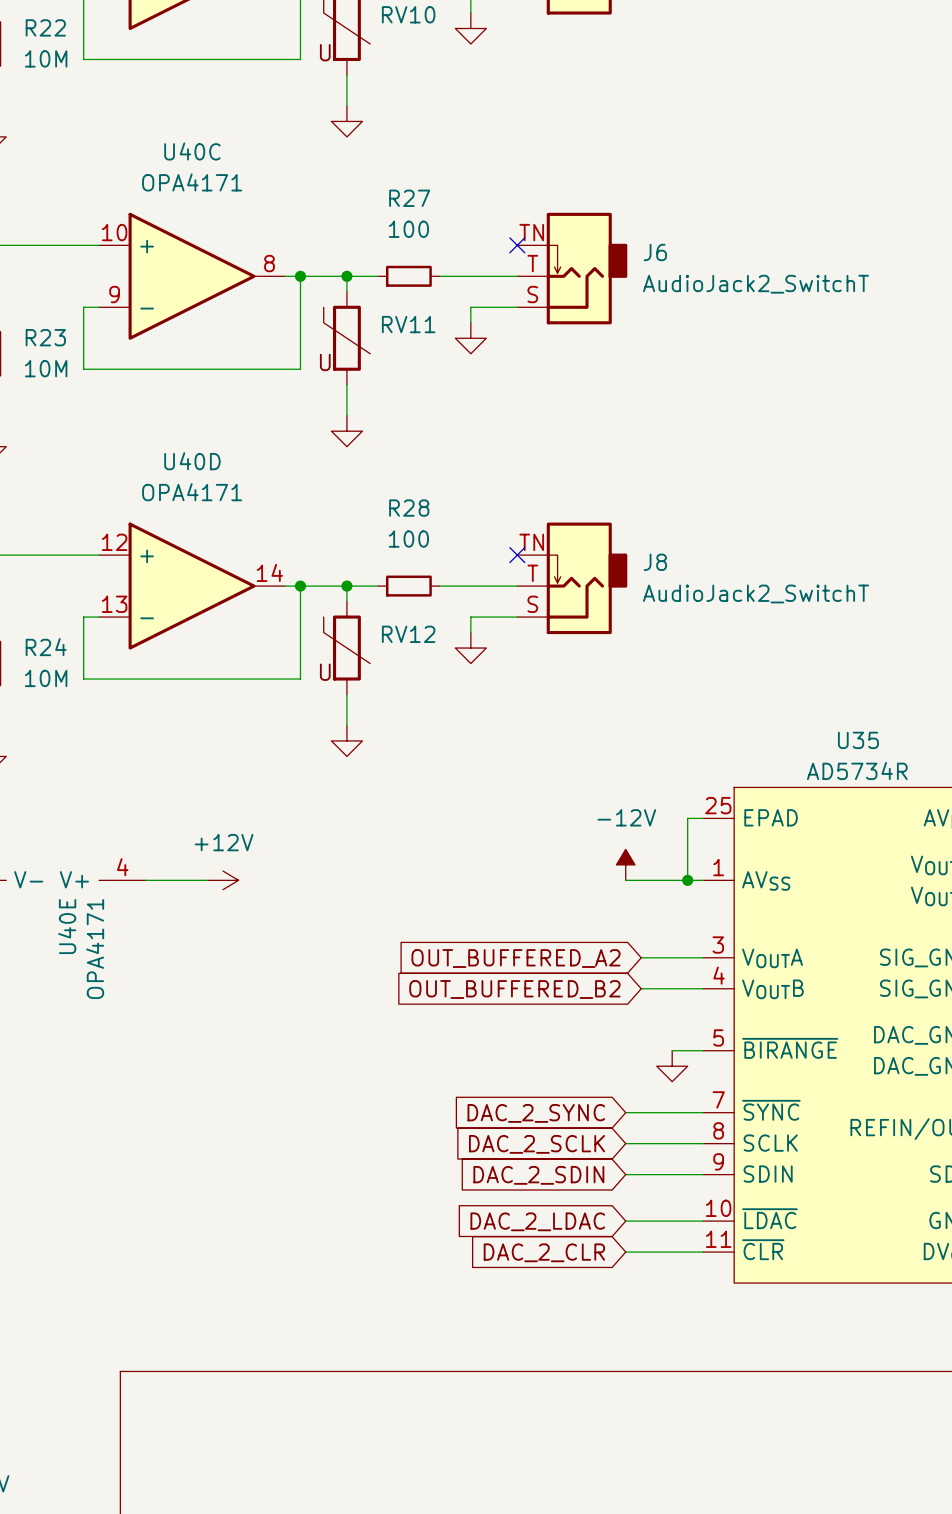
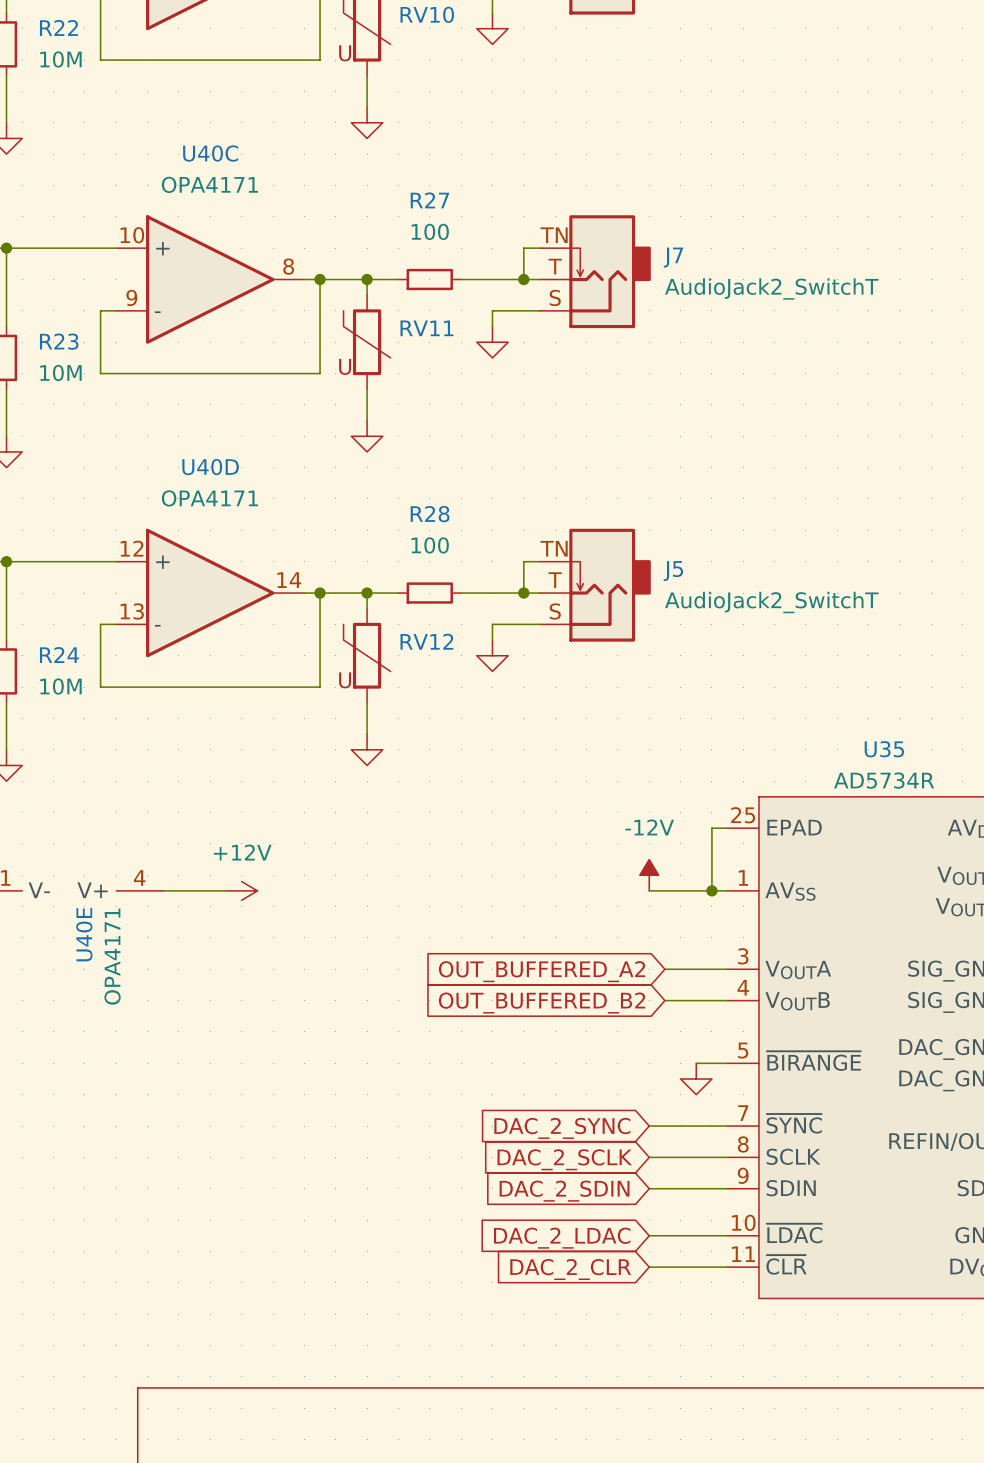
wire: none -> (539, 248) (523, 248) (523, 279)
no-connect mark: (517, 245) -> none
J6 name: J6 (655, 252) -> J7 (673, 257)
junction: none -> (523, 279)
wire: none -> (539, 561) (523, 561) (523, 593)
no-connect mark: (517, 555) -> none
J8 name: J8 (655, 562) -> J5 (673, 571)
junction: none -> (523, 593)

